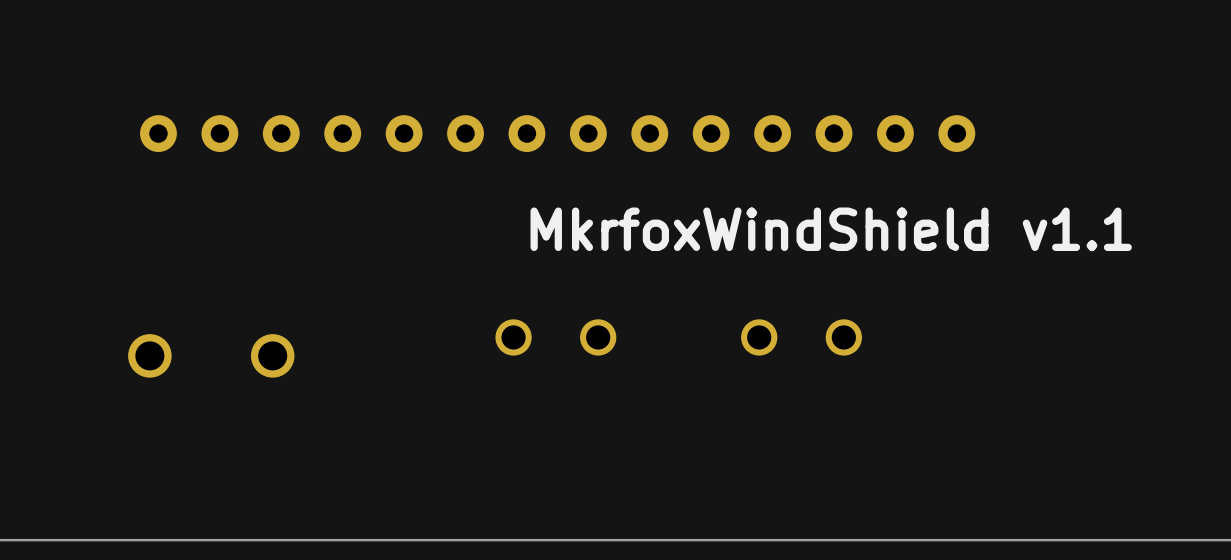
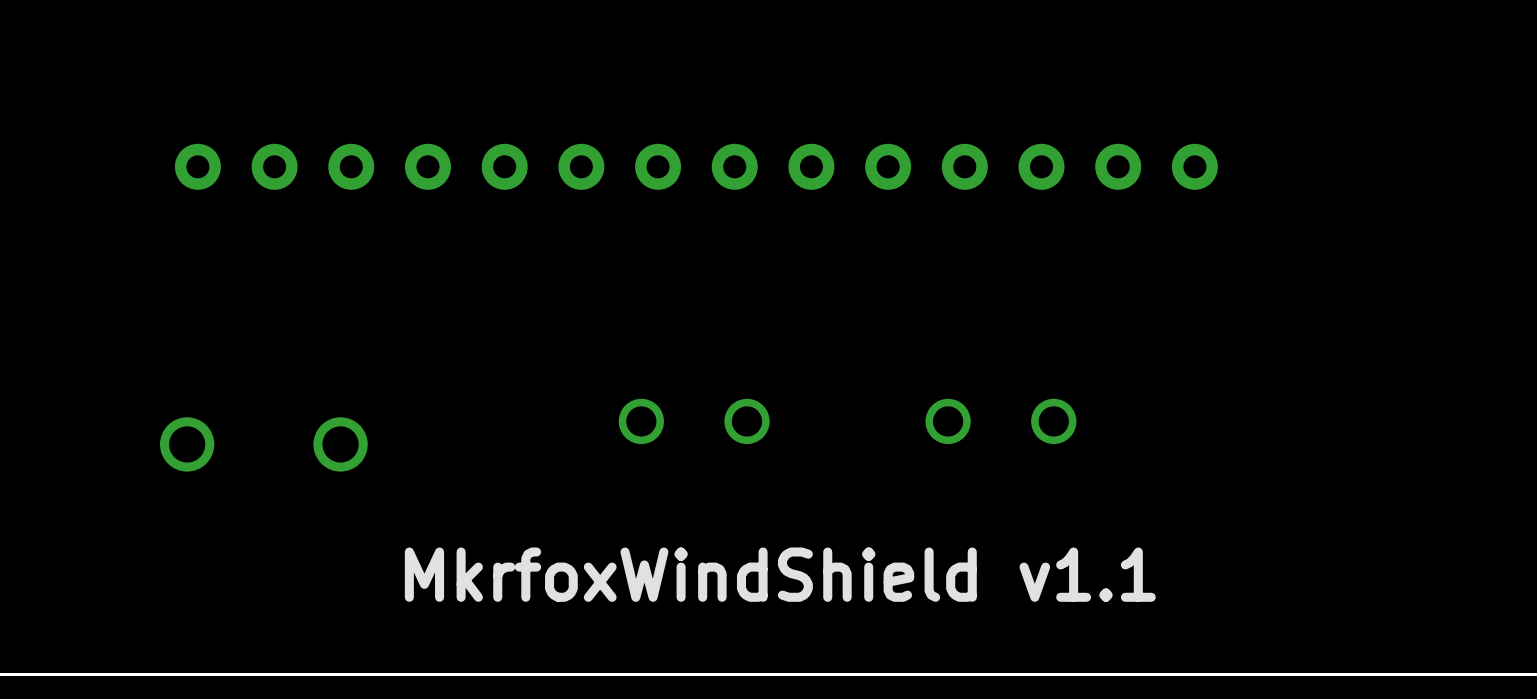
text position: MkrfoxWindShield v1.1 (831, 229) -> MkrfoxWindShield v1.1 (780, 574)

